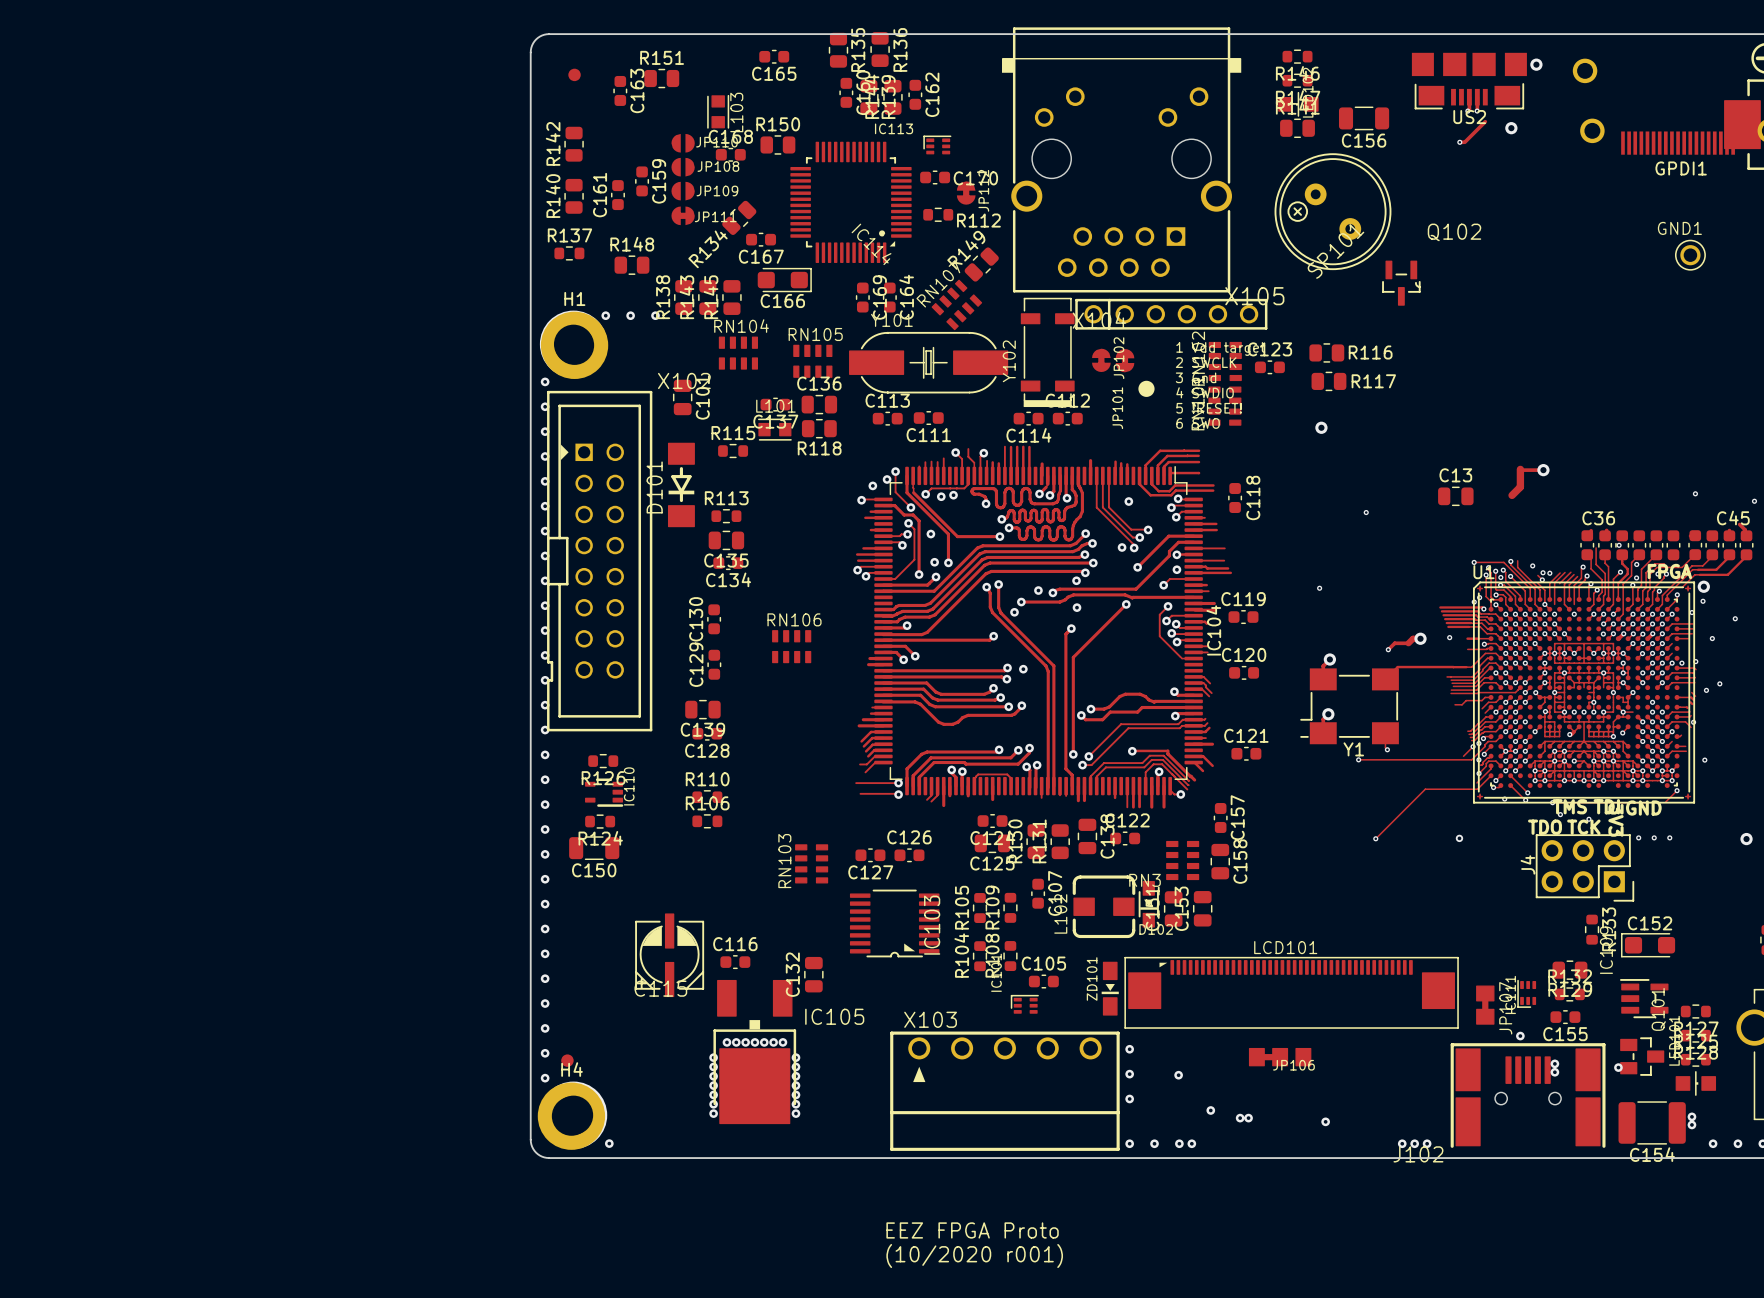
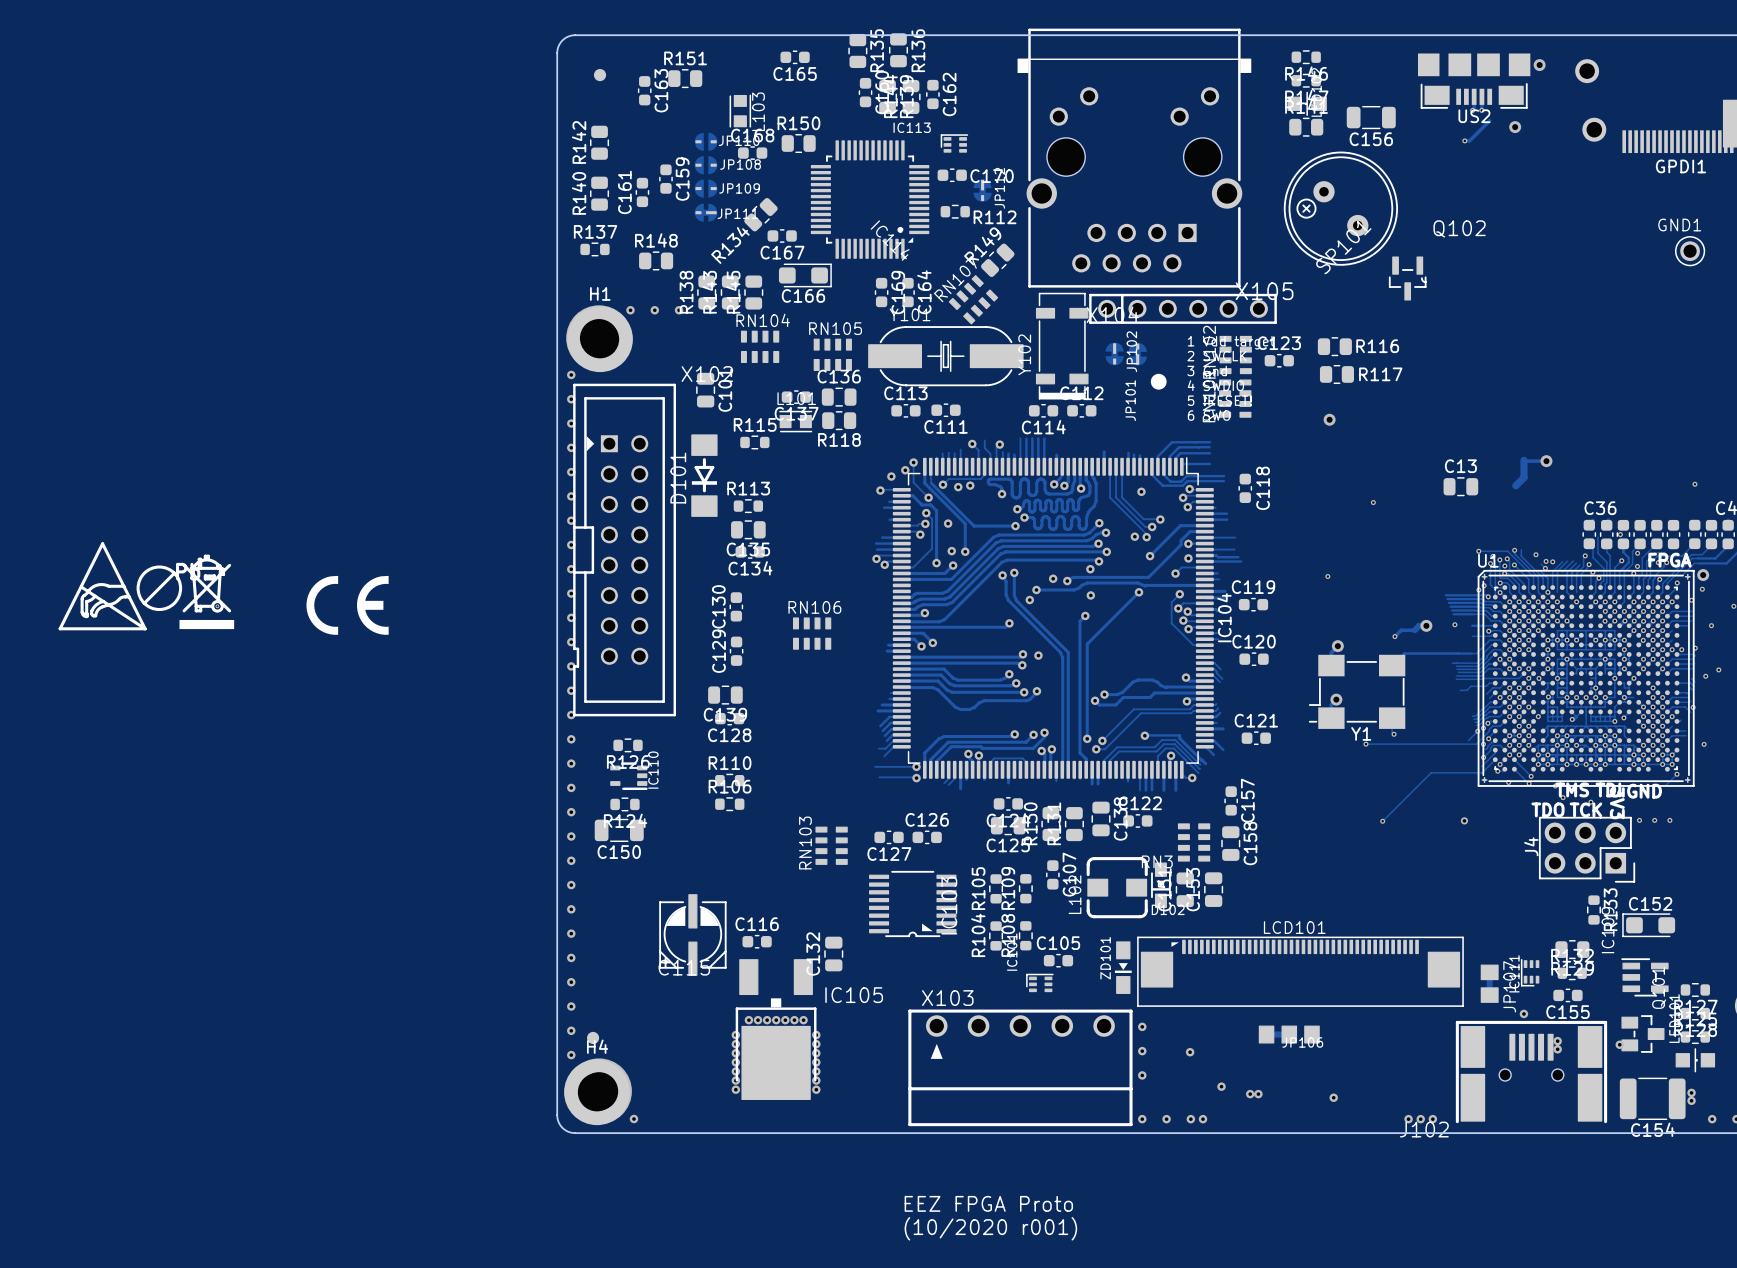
drawing: none -> [58, 542, 235, 631]
drawing: none -> [306, 575, 389, 635]

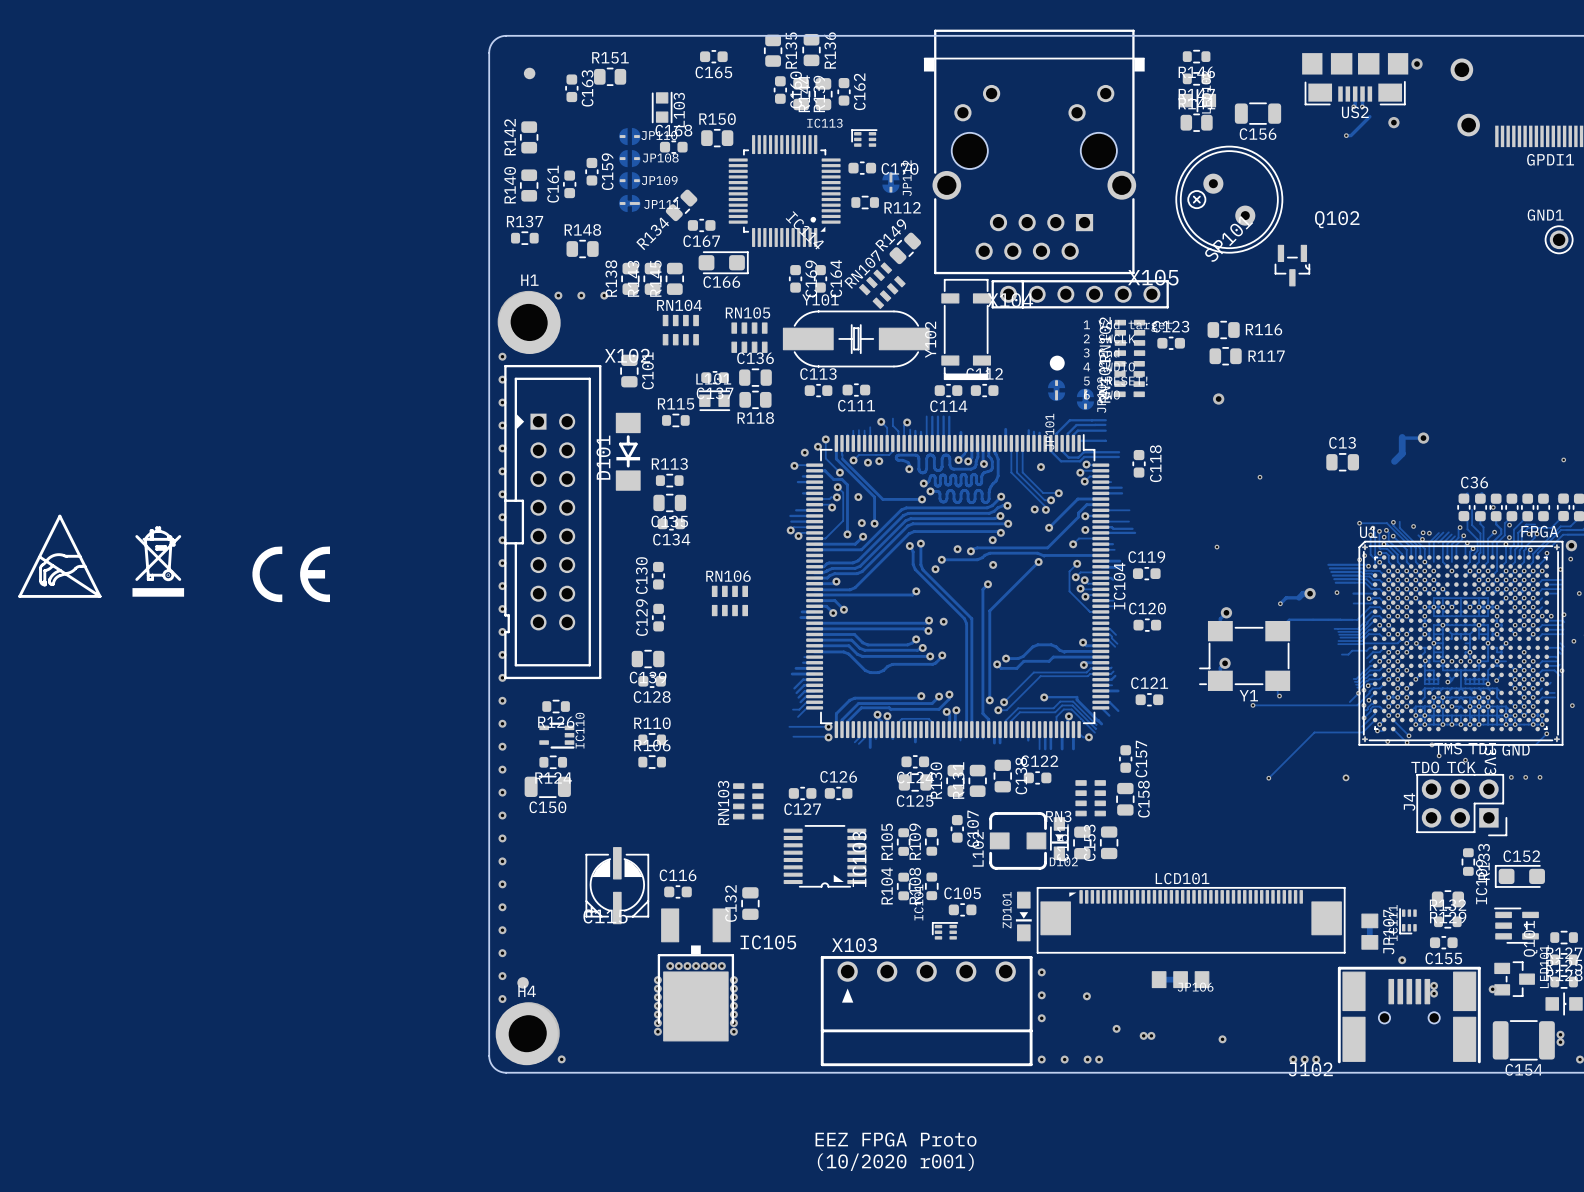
JP102 position: (1114, 353) -> (1085, 399)
JP101 position: (1137, 354) -> (1056, 390)
drawing: [136, 565, 183, 612] -> none

